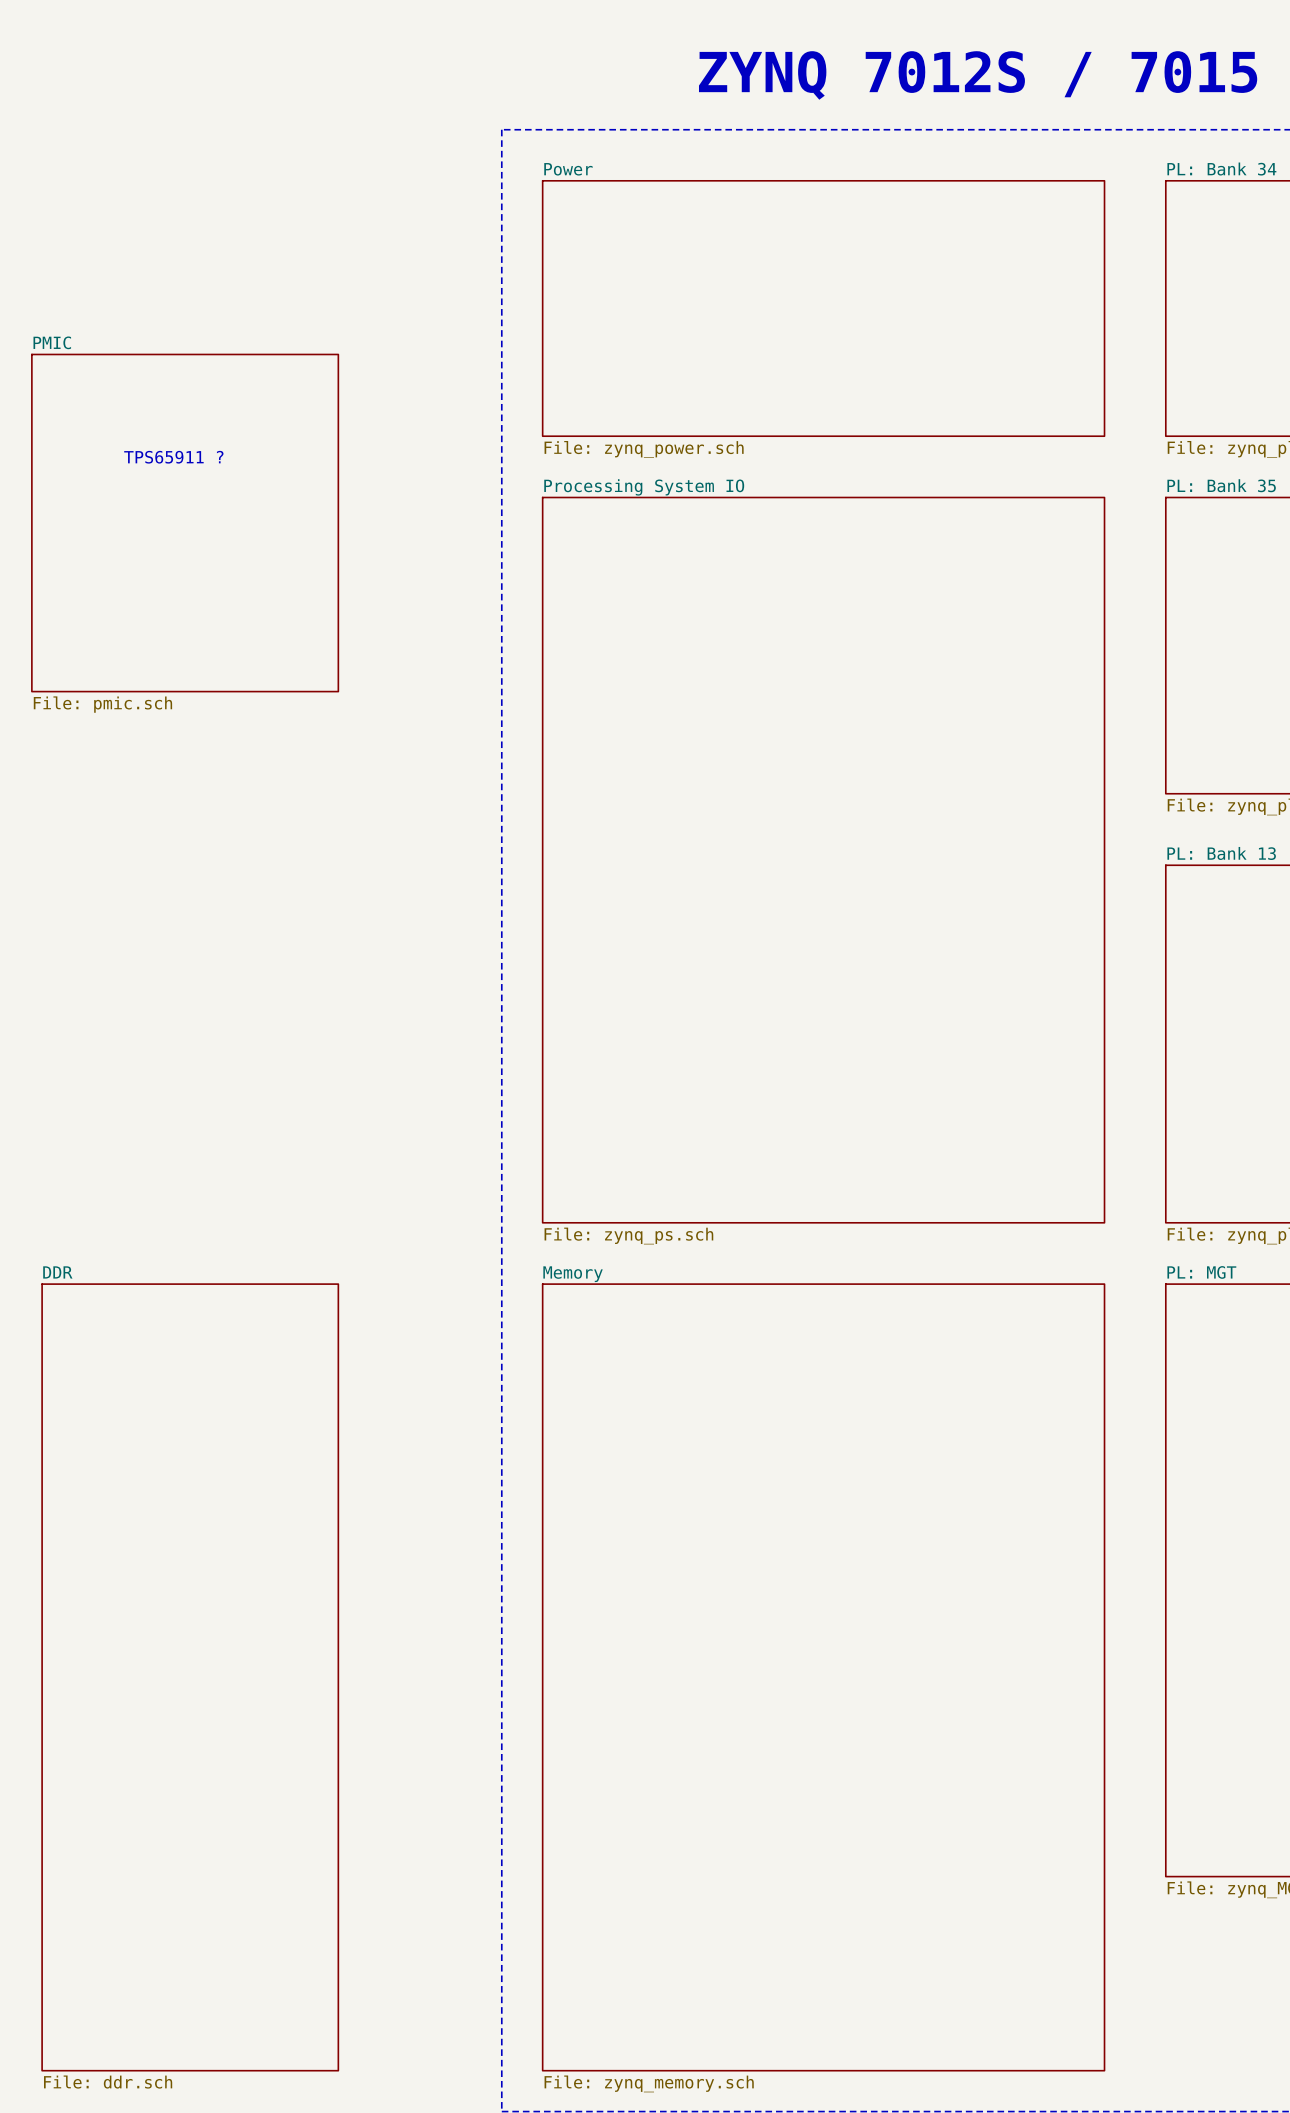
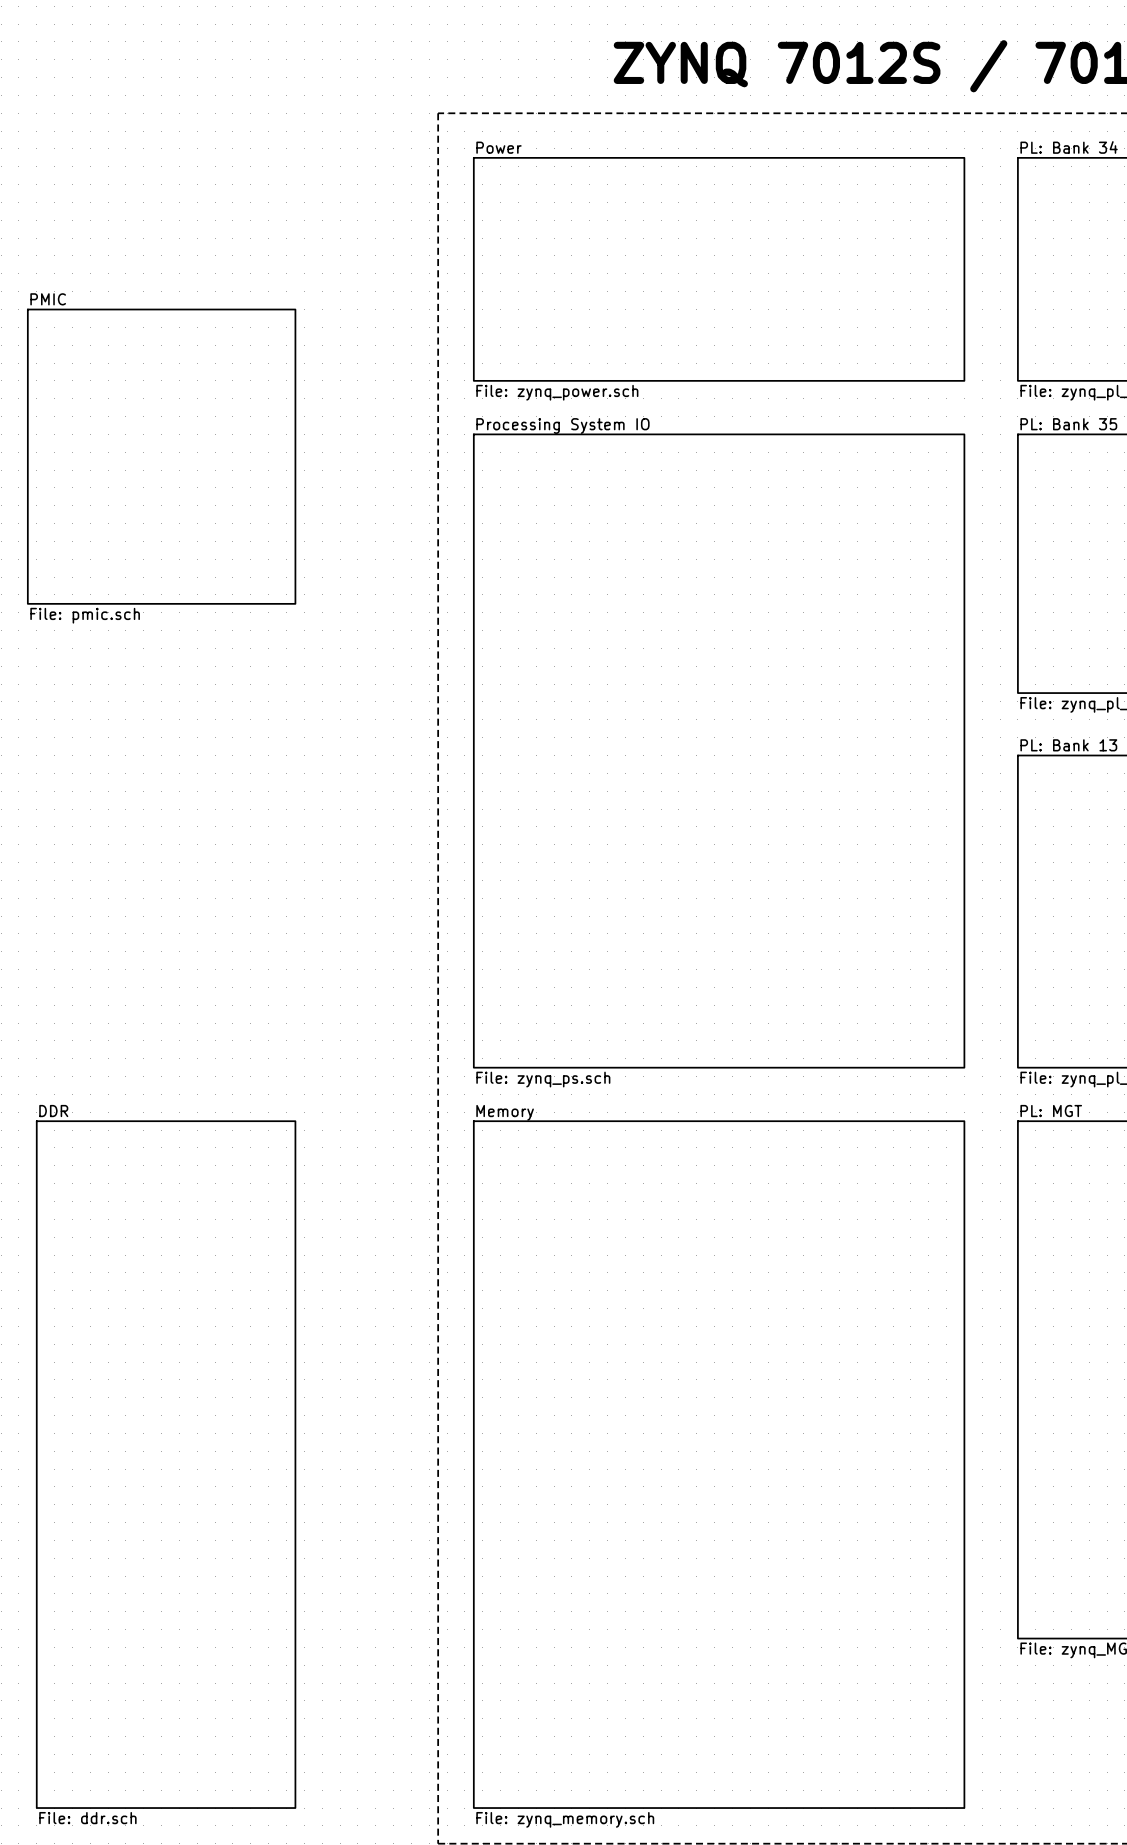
text: TPS65911 ? (173, 457) -> none

